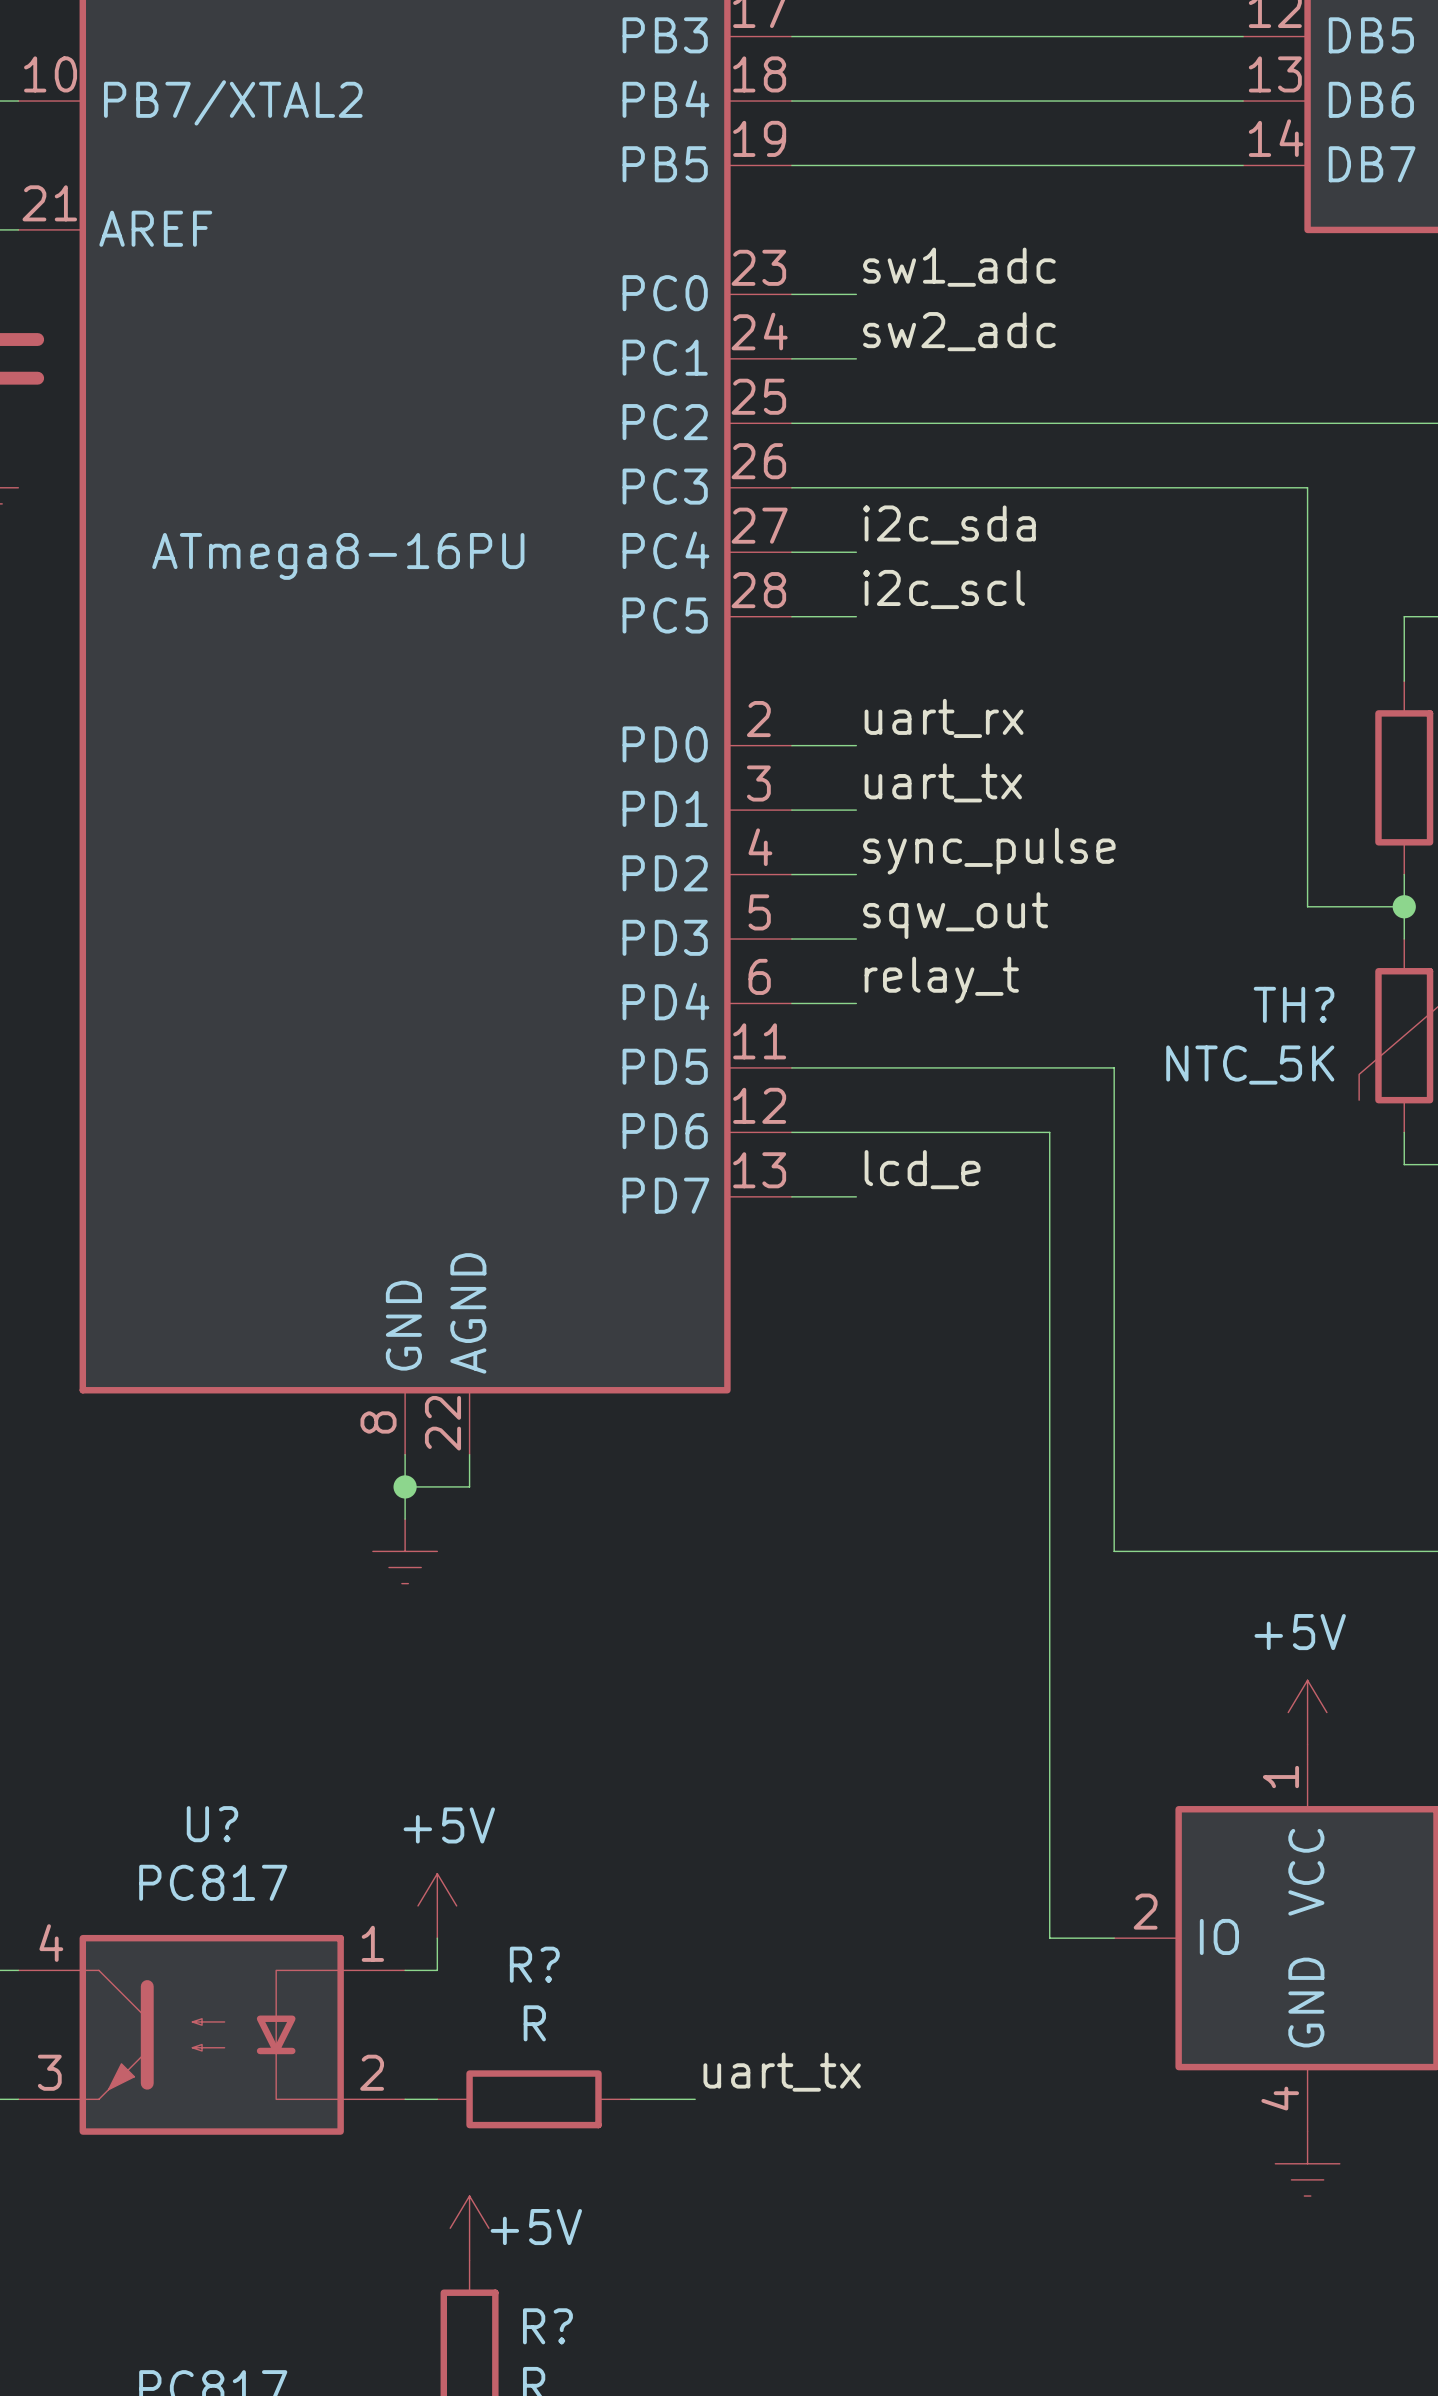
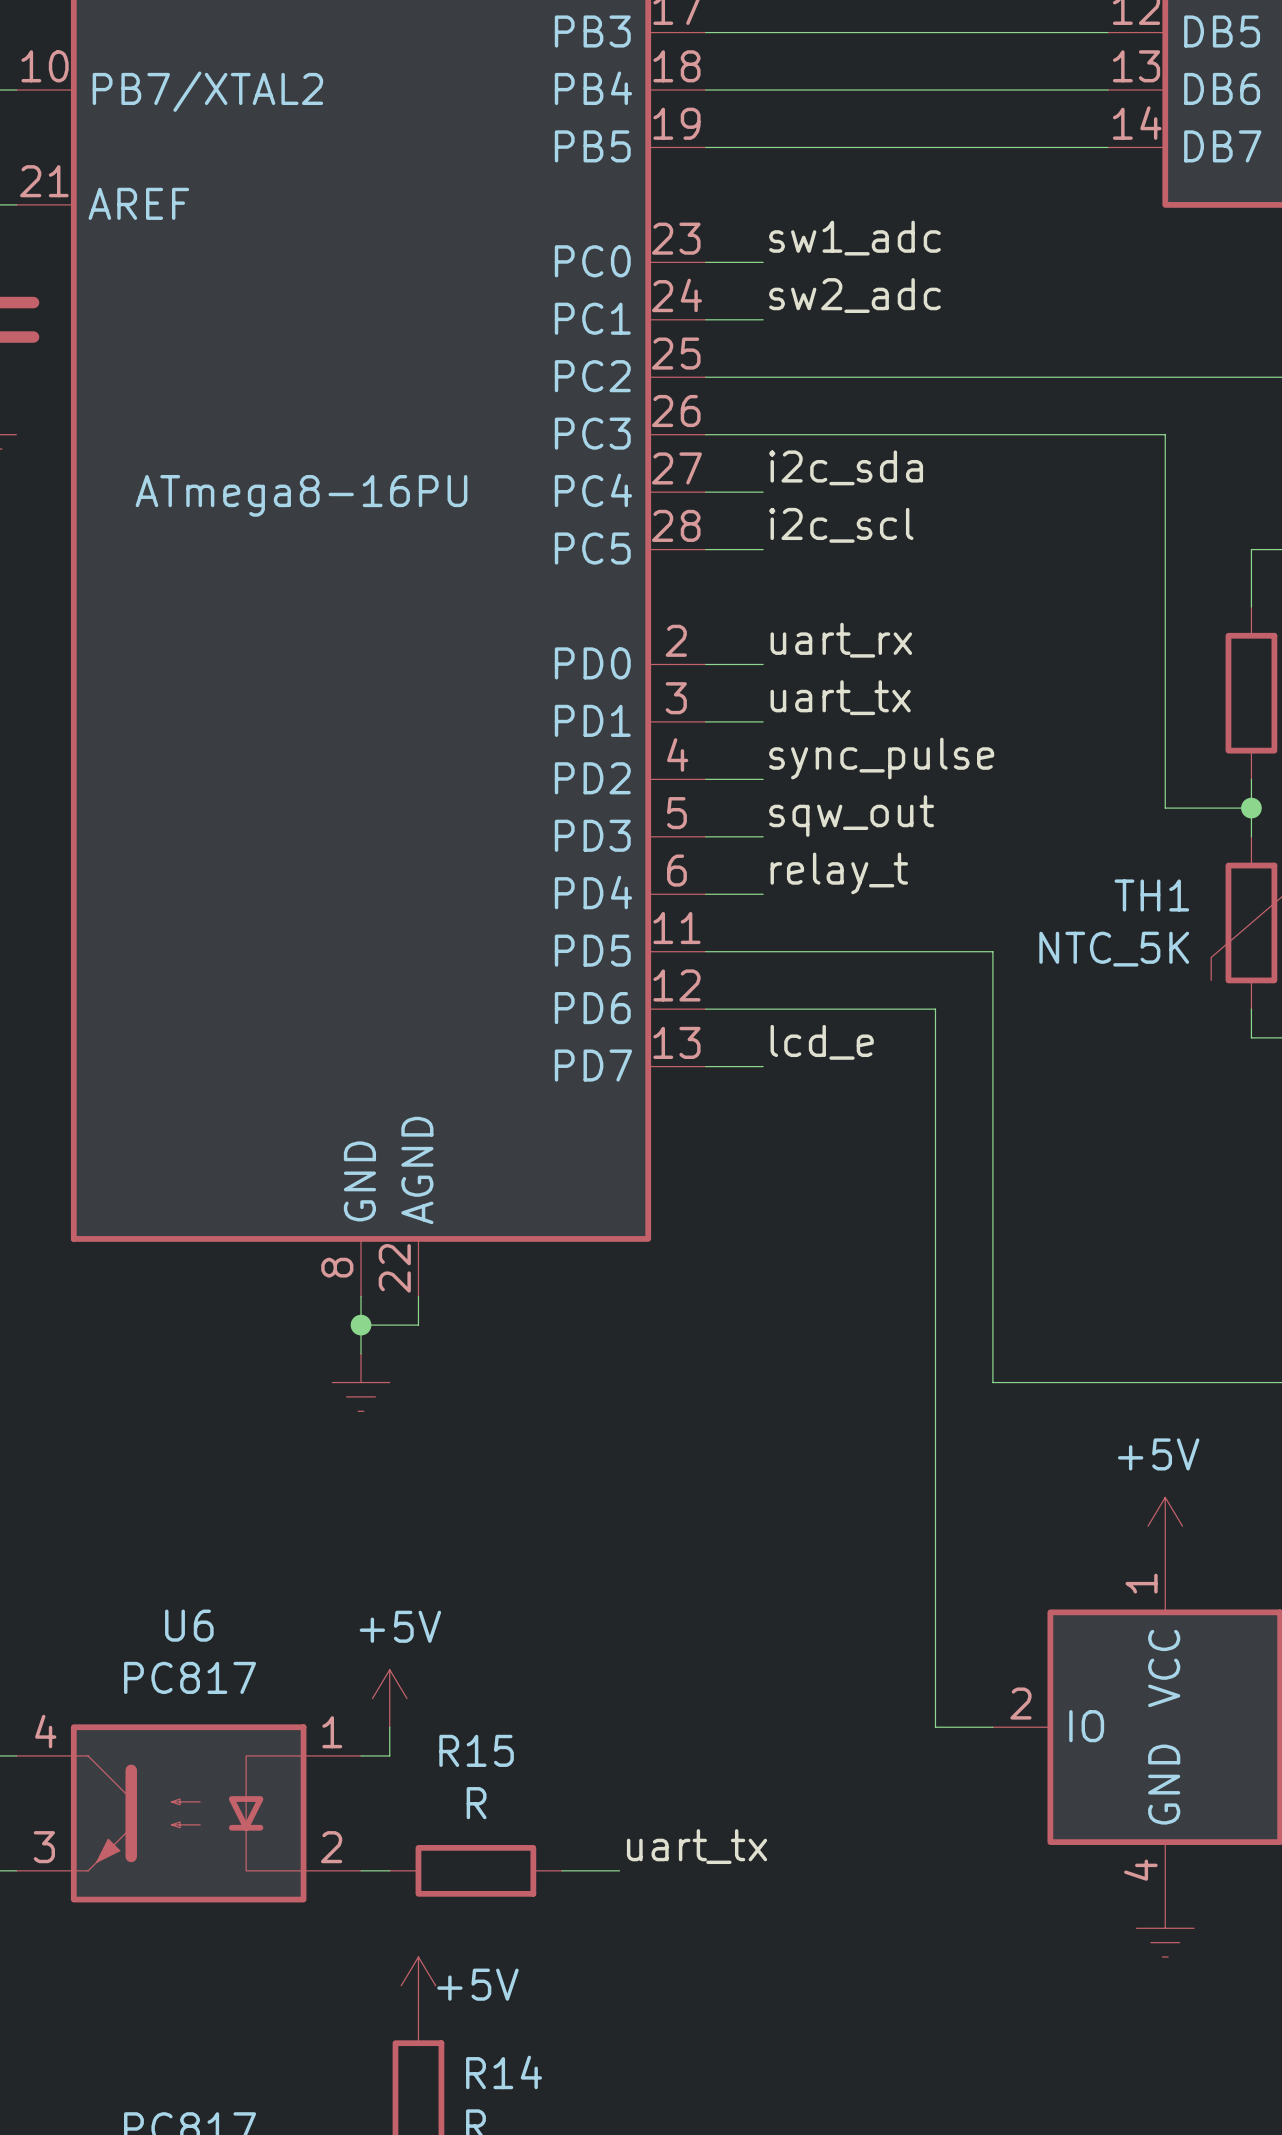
TH? name: TH? (1294, 1004) -> TH1 (1151, 895)
U? name: U? (212, 1824) -> U6 (189, 1625)
R? name: R? (534, 1964) -> R15 (476, 1750)
R? name: R? (547, 2326) -> R14 (504, 2072)

